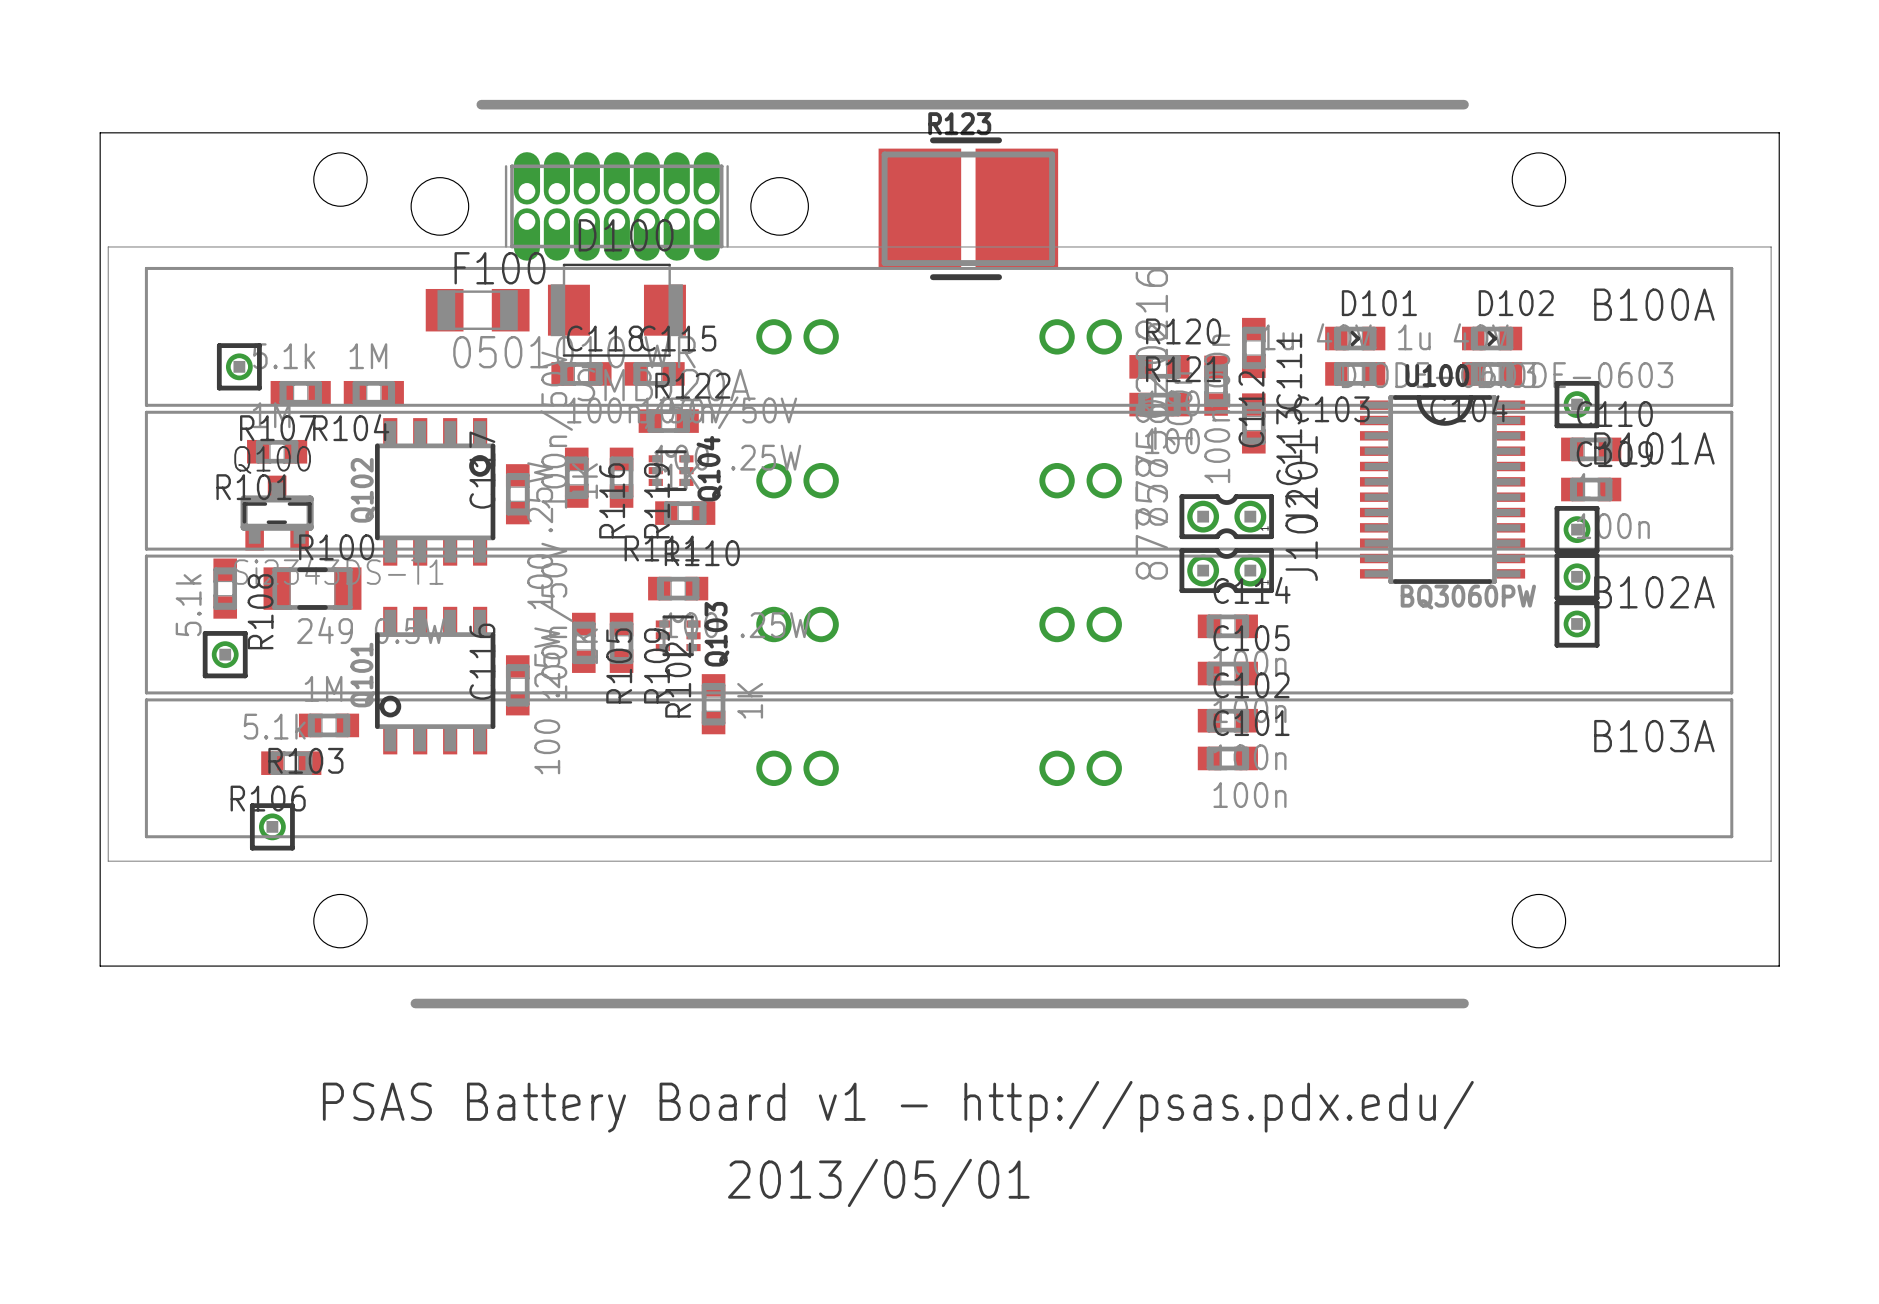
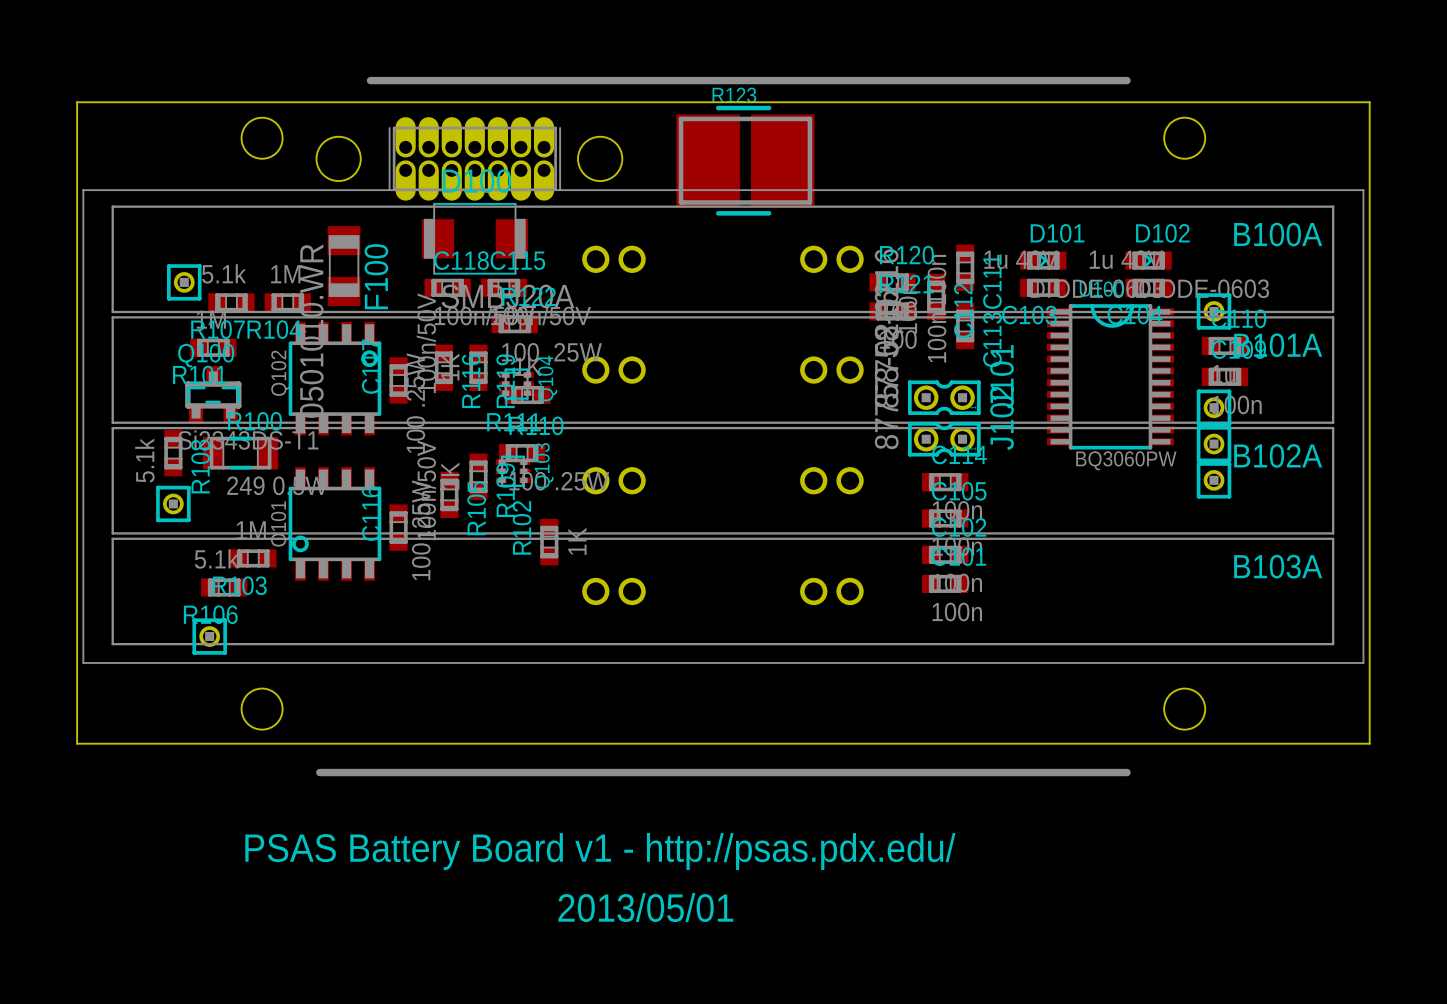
F100 rotation: 0° (477, 310) -> 90° clockwise (344, 266)
Q104 position: (671, 470) -> (516, 384)
Q103 position: (678, 635) -> (512, 471)
R109 position: (621, 642) -> (478, 476)

